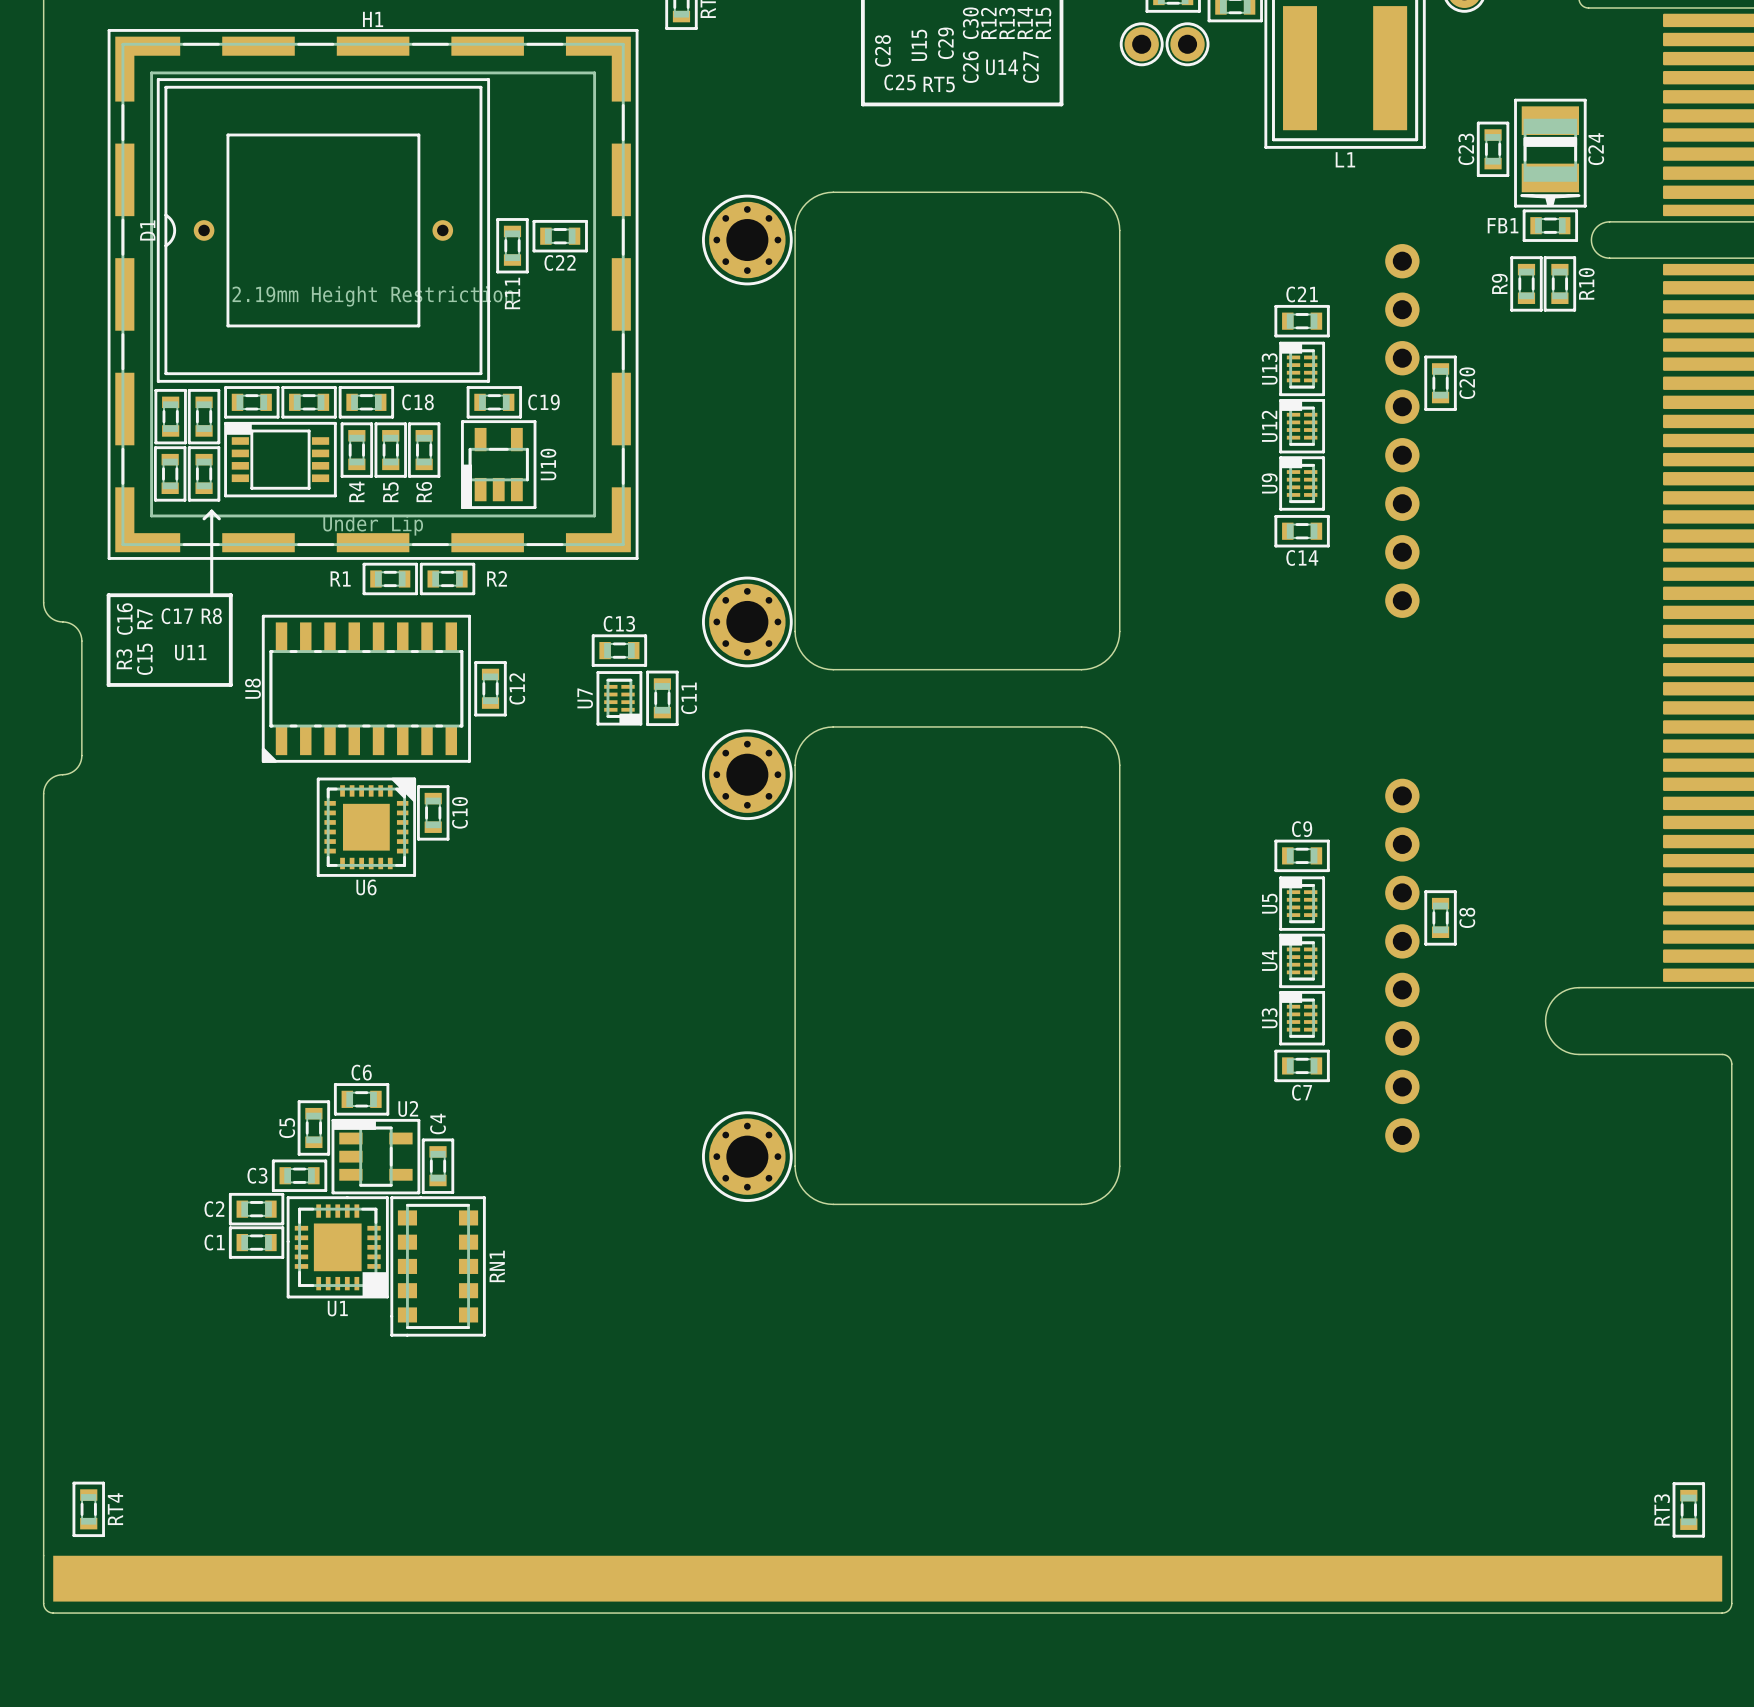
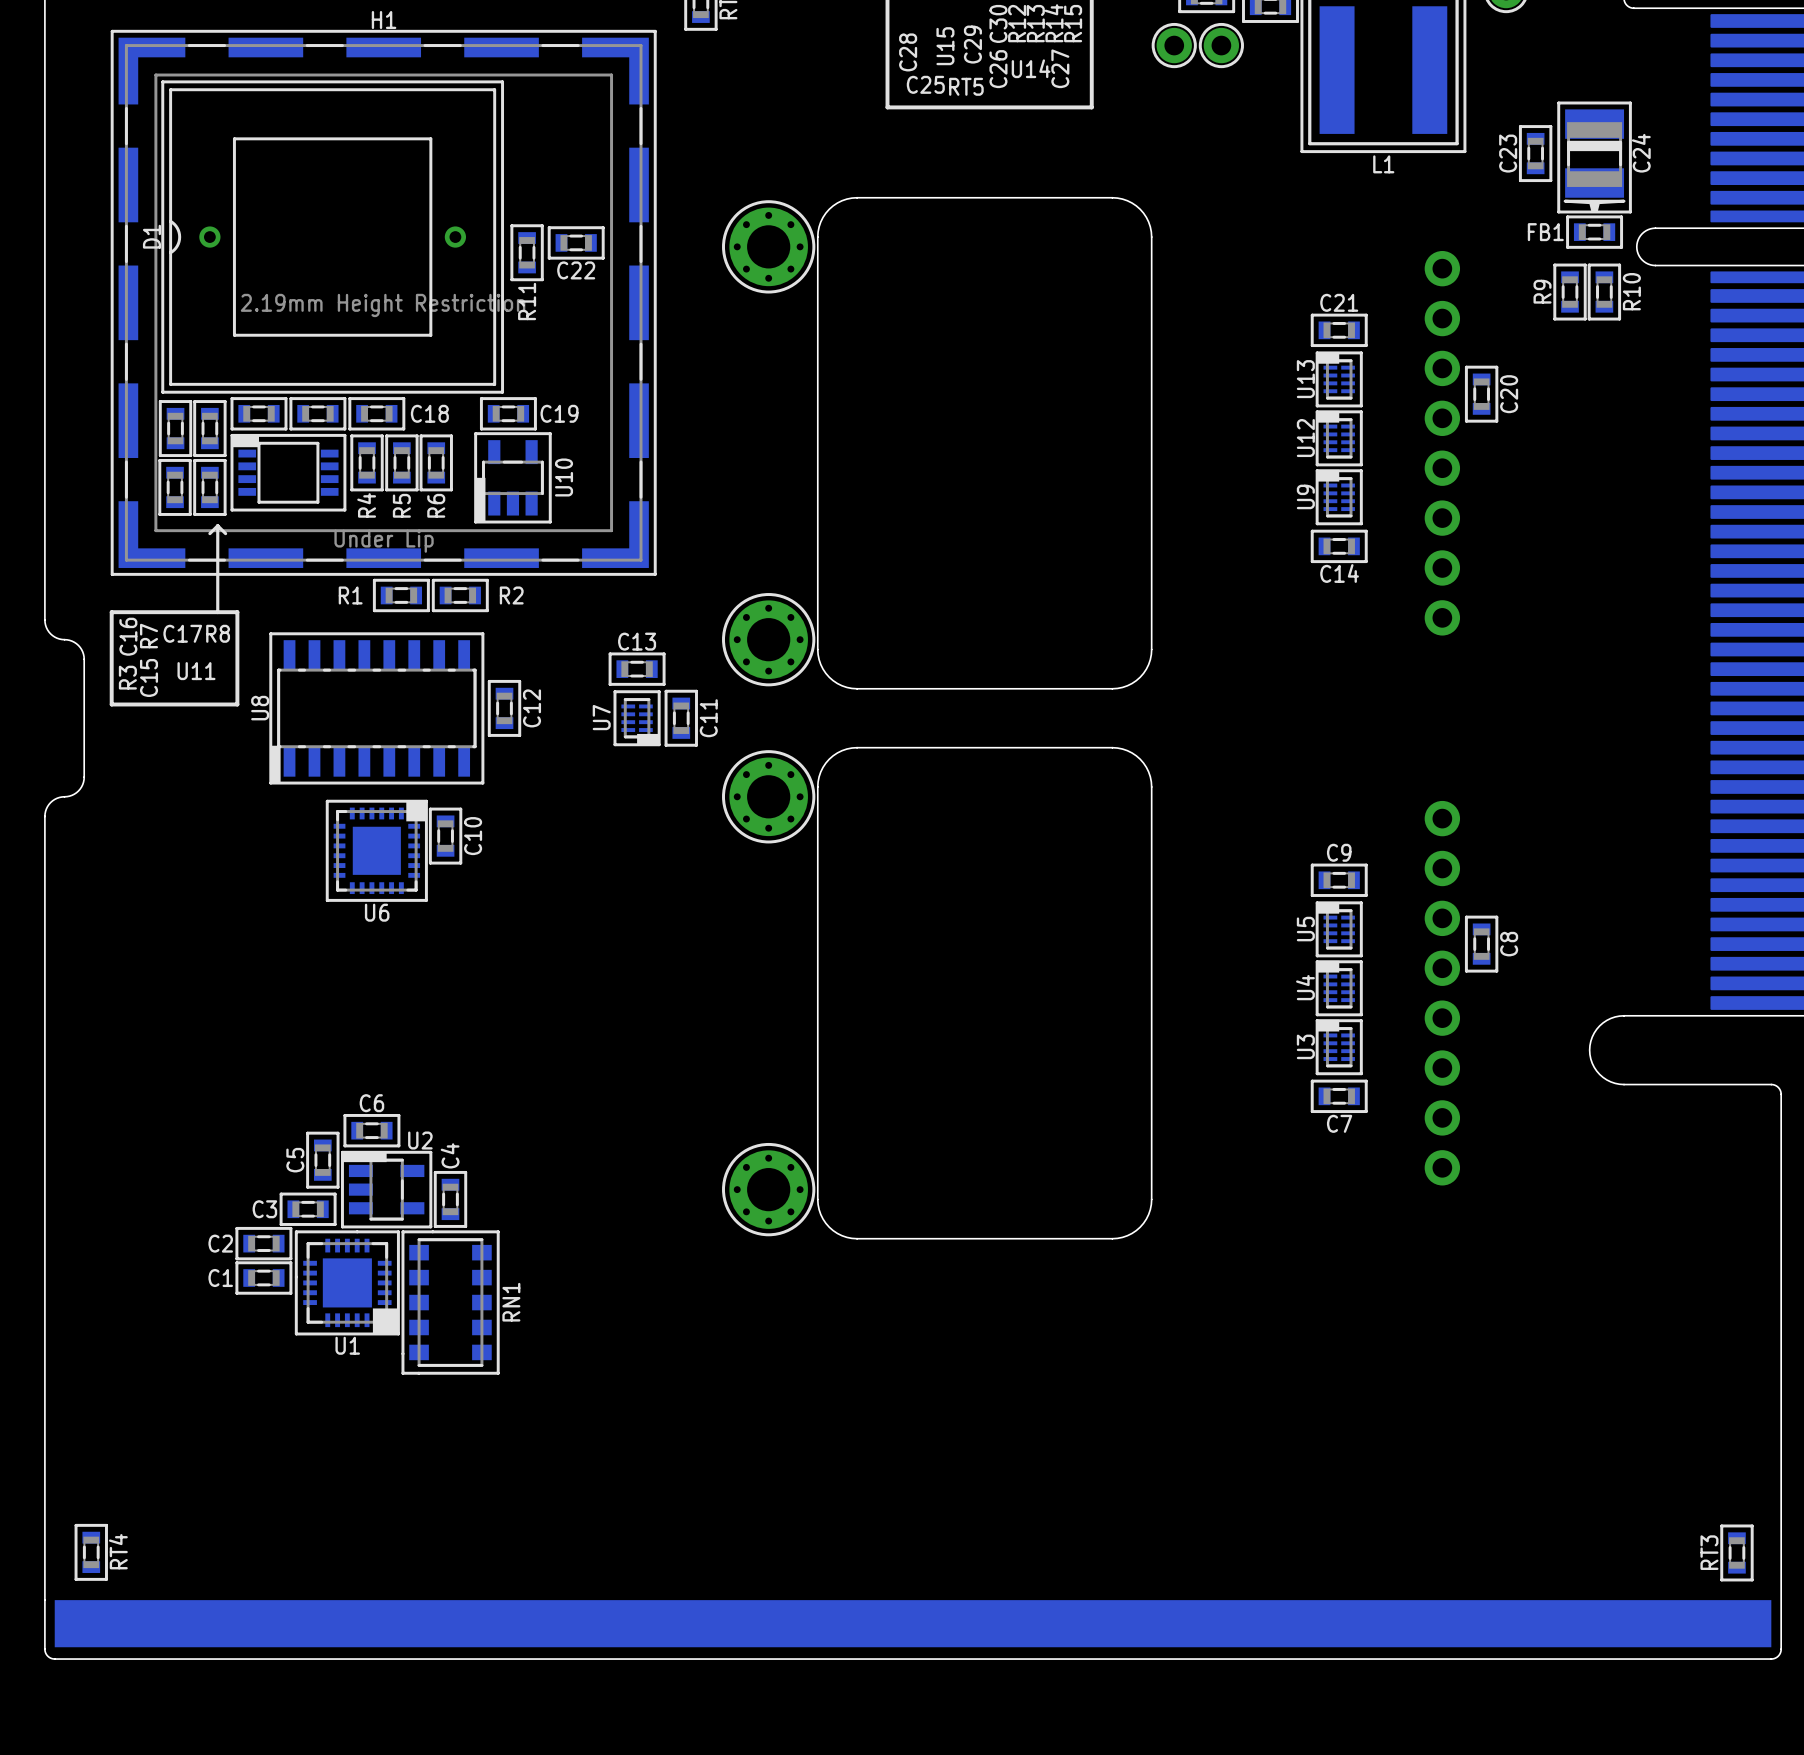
U8 footprint: [261, 614, 471, 763] -> [269, 632, 485, 785]
U6 footprint: [316, 777, 417, 877] -> [325, 799, 428, 902]

